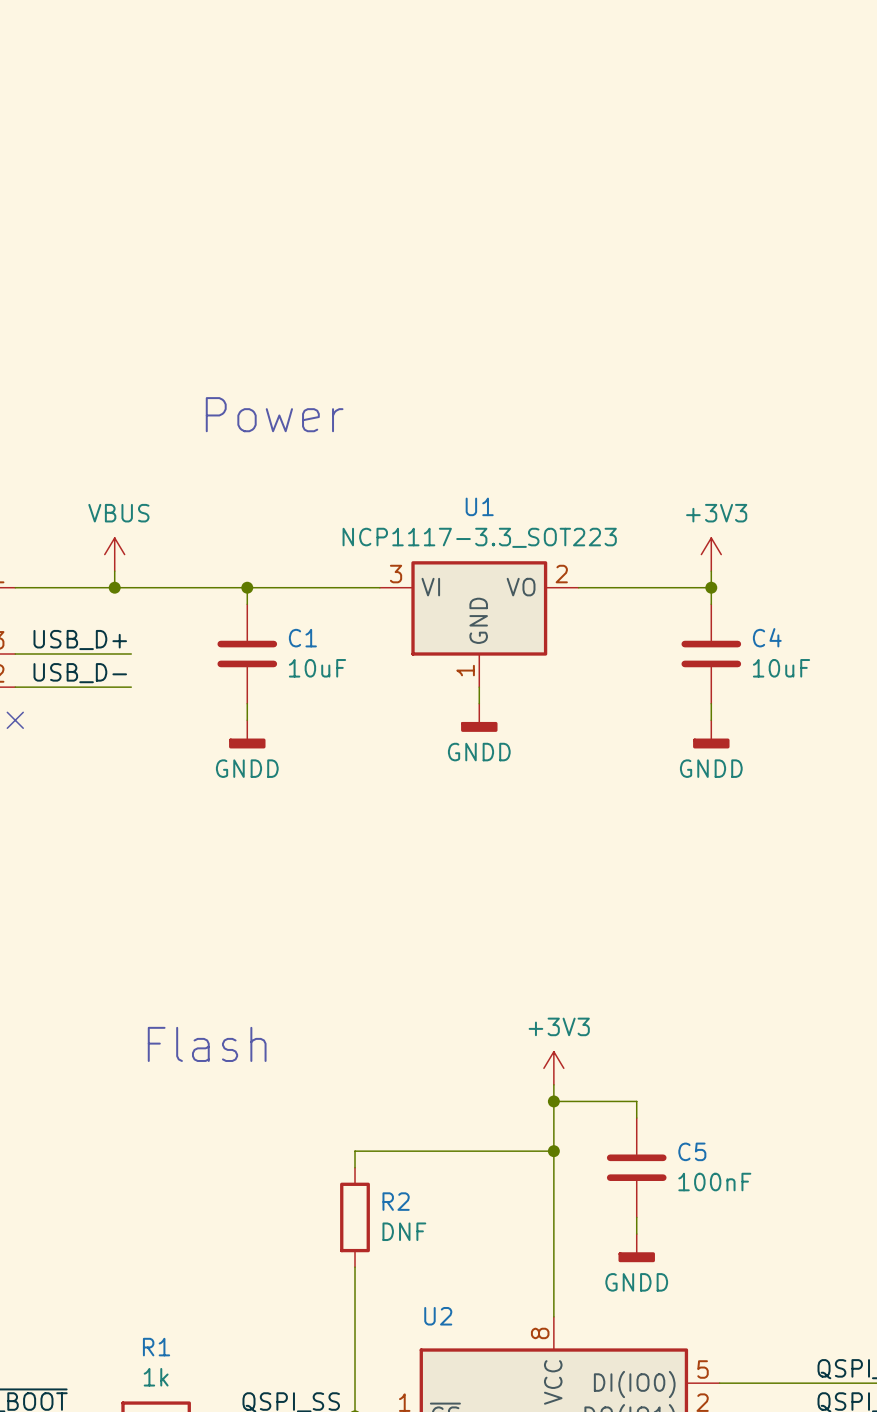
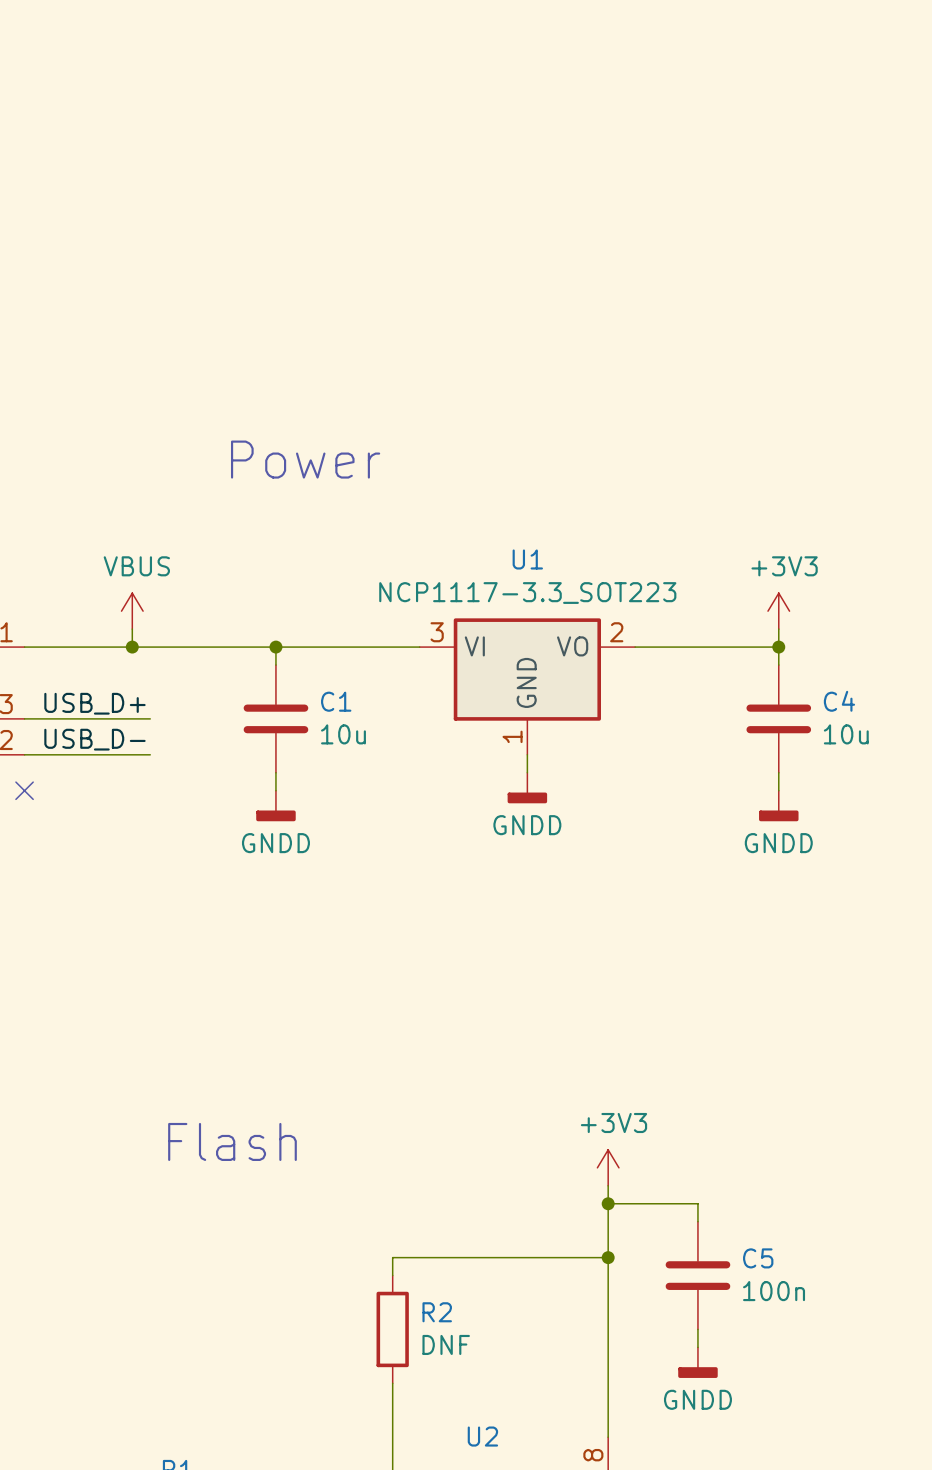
C1 value: 10uF (317, 668) -> 10u (343, 734)
C4 value: 10uF (781, 668) -> 10u (846, 734)
C5 value: 100nF (714, 1182) -> 100n (774, 1291)

